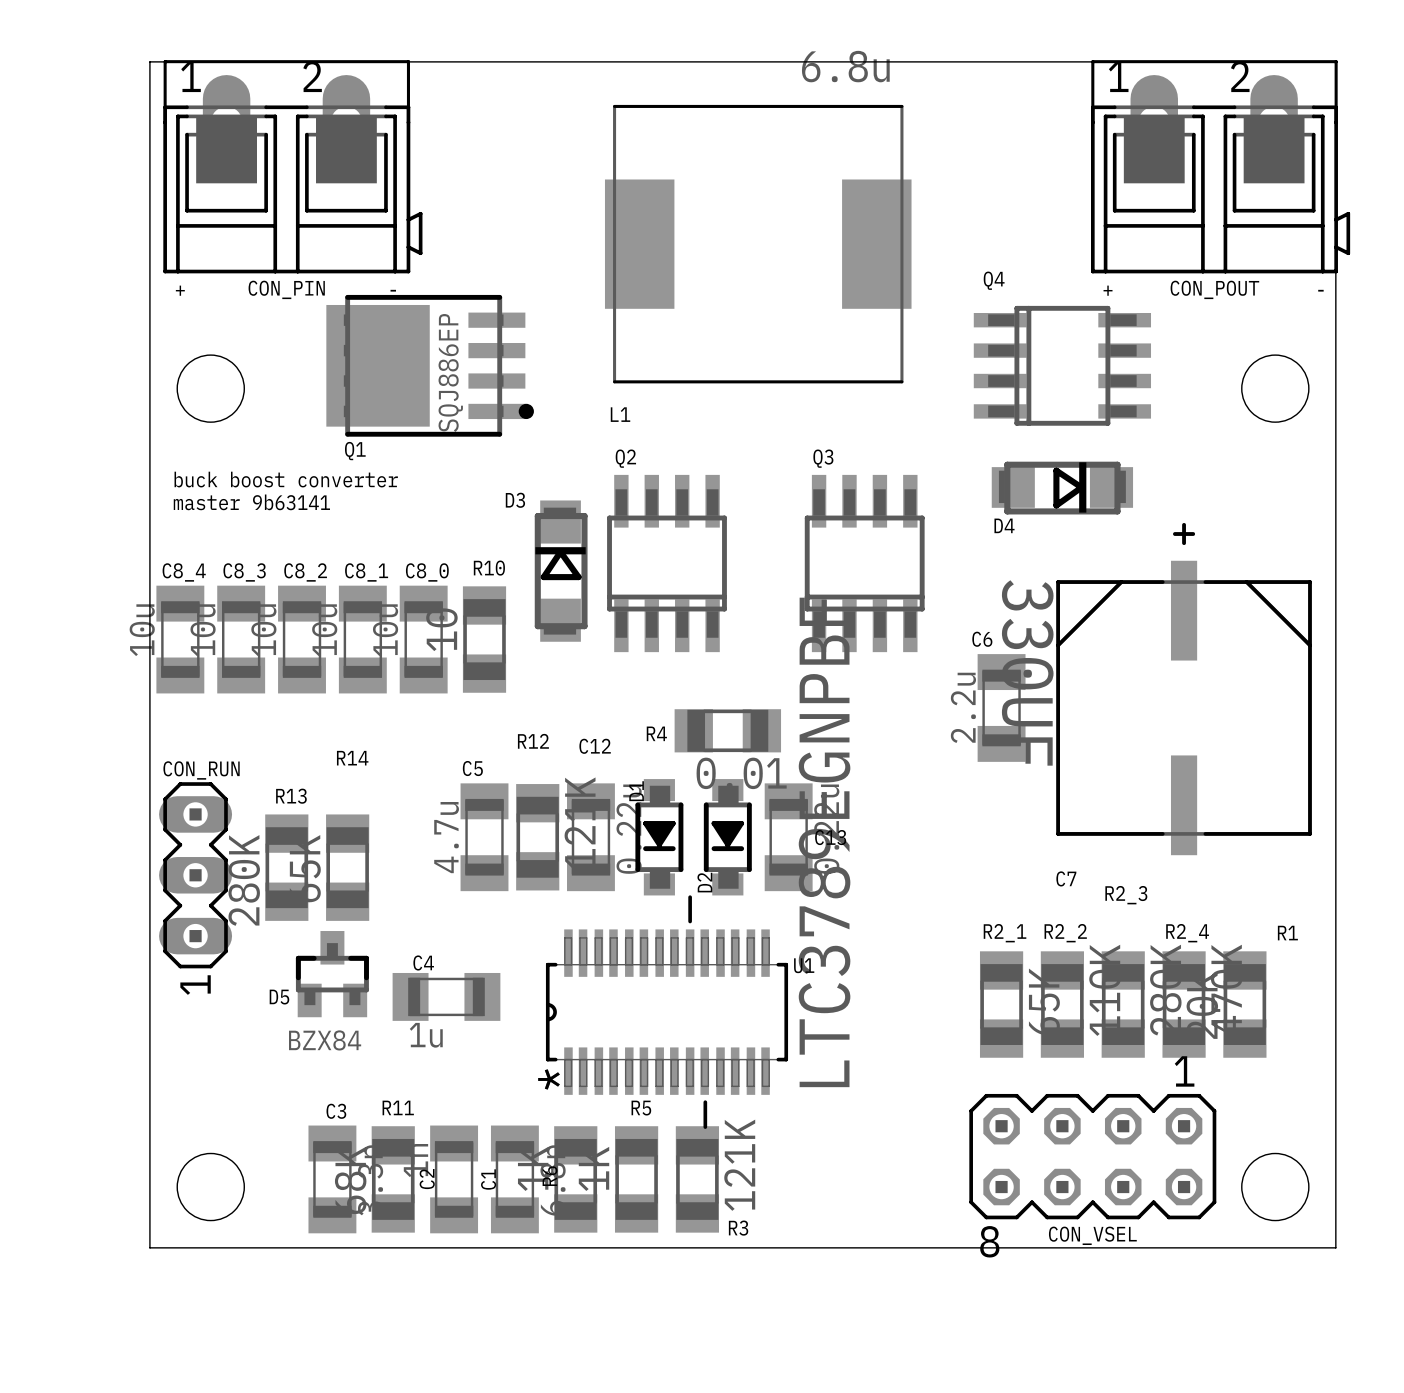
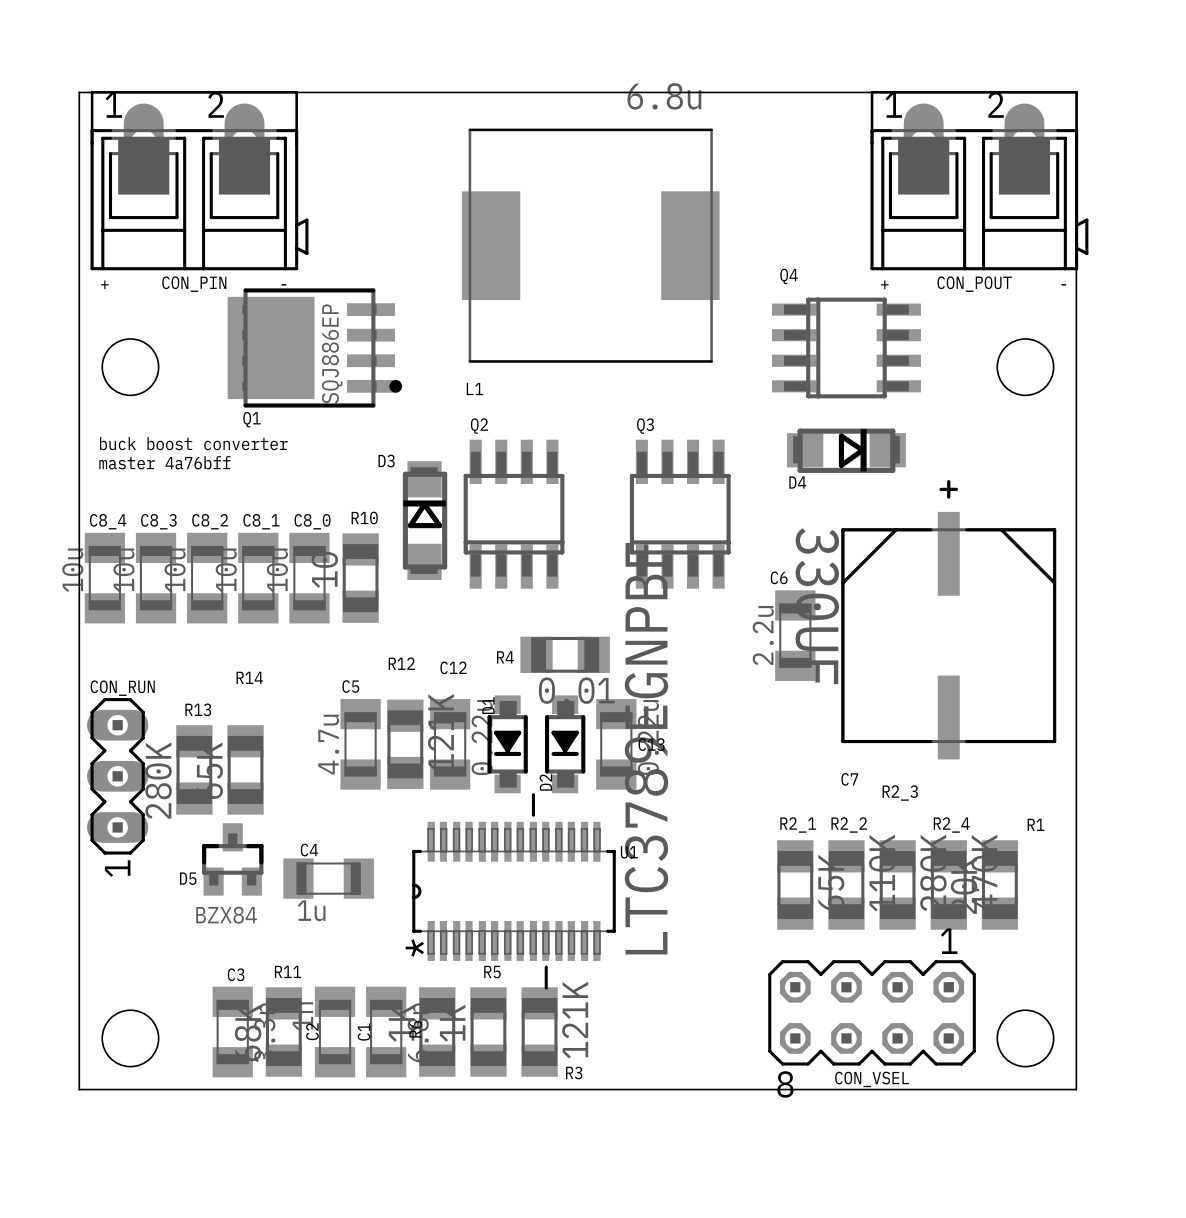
text: master 9b63141 (251, 502) -> master 4a76bff (164, 462)

